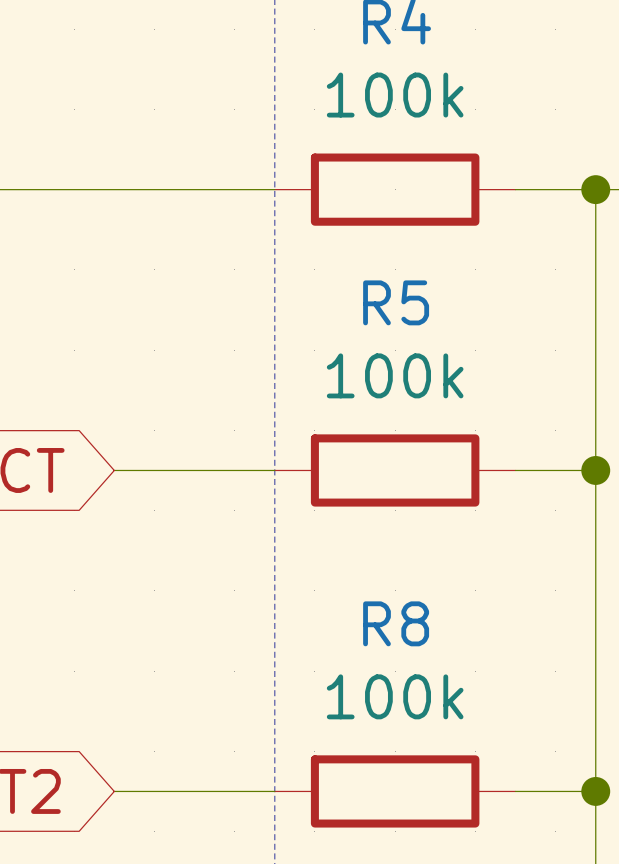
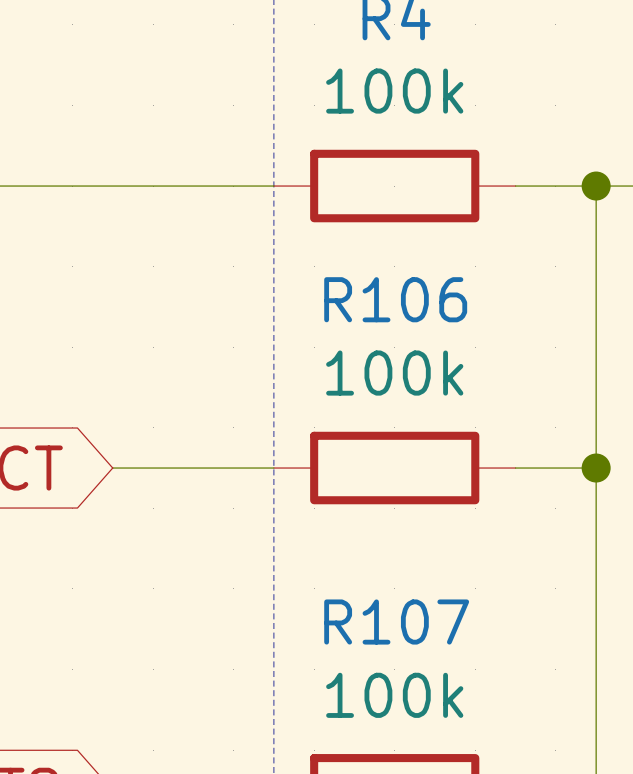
R5 name: R5 (396, 302) -> R106 (395, 299)
R8 name: R8 (396, 623) -> R107 (396, 622)

